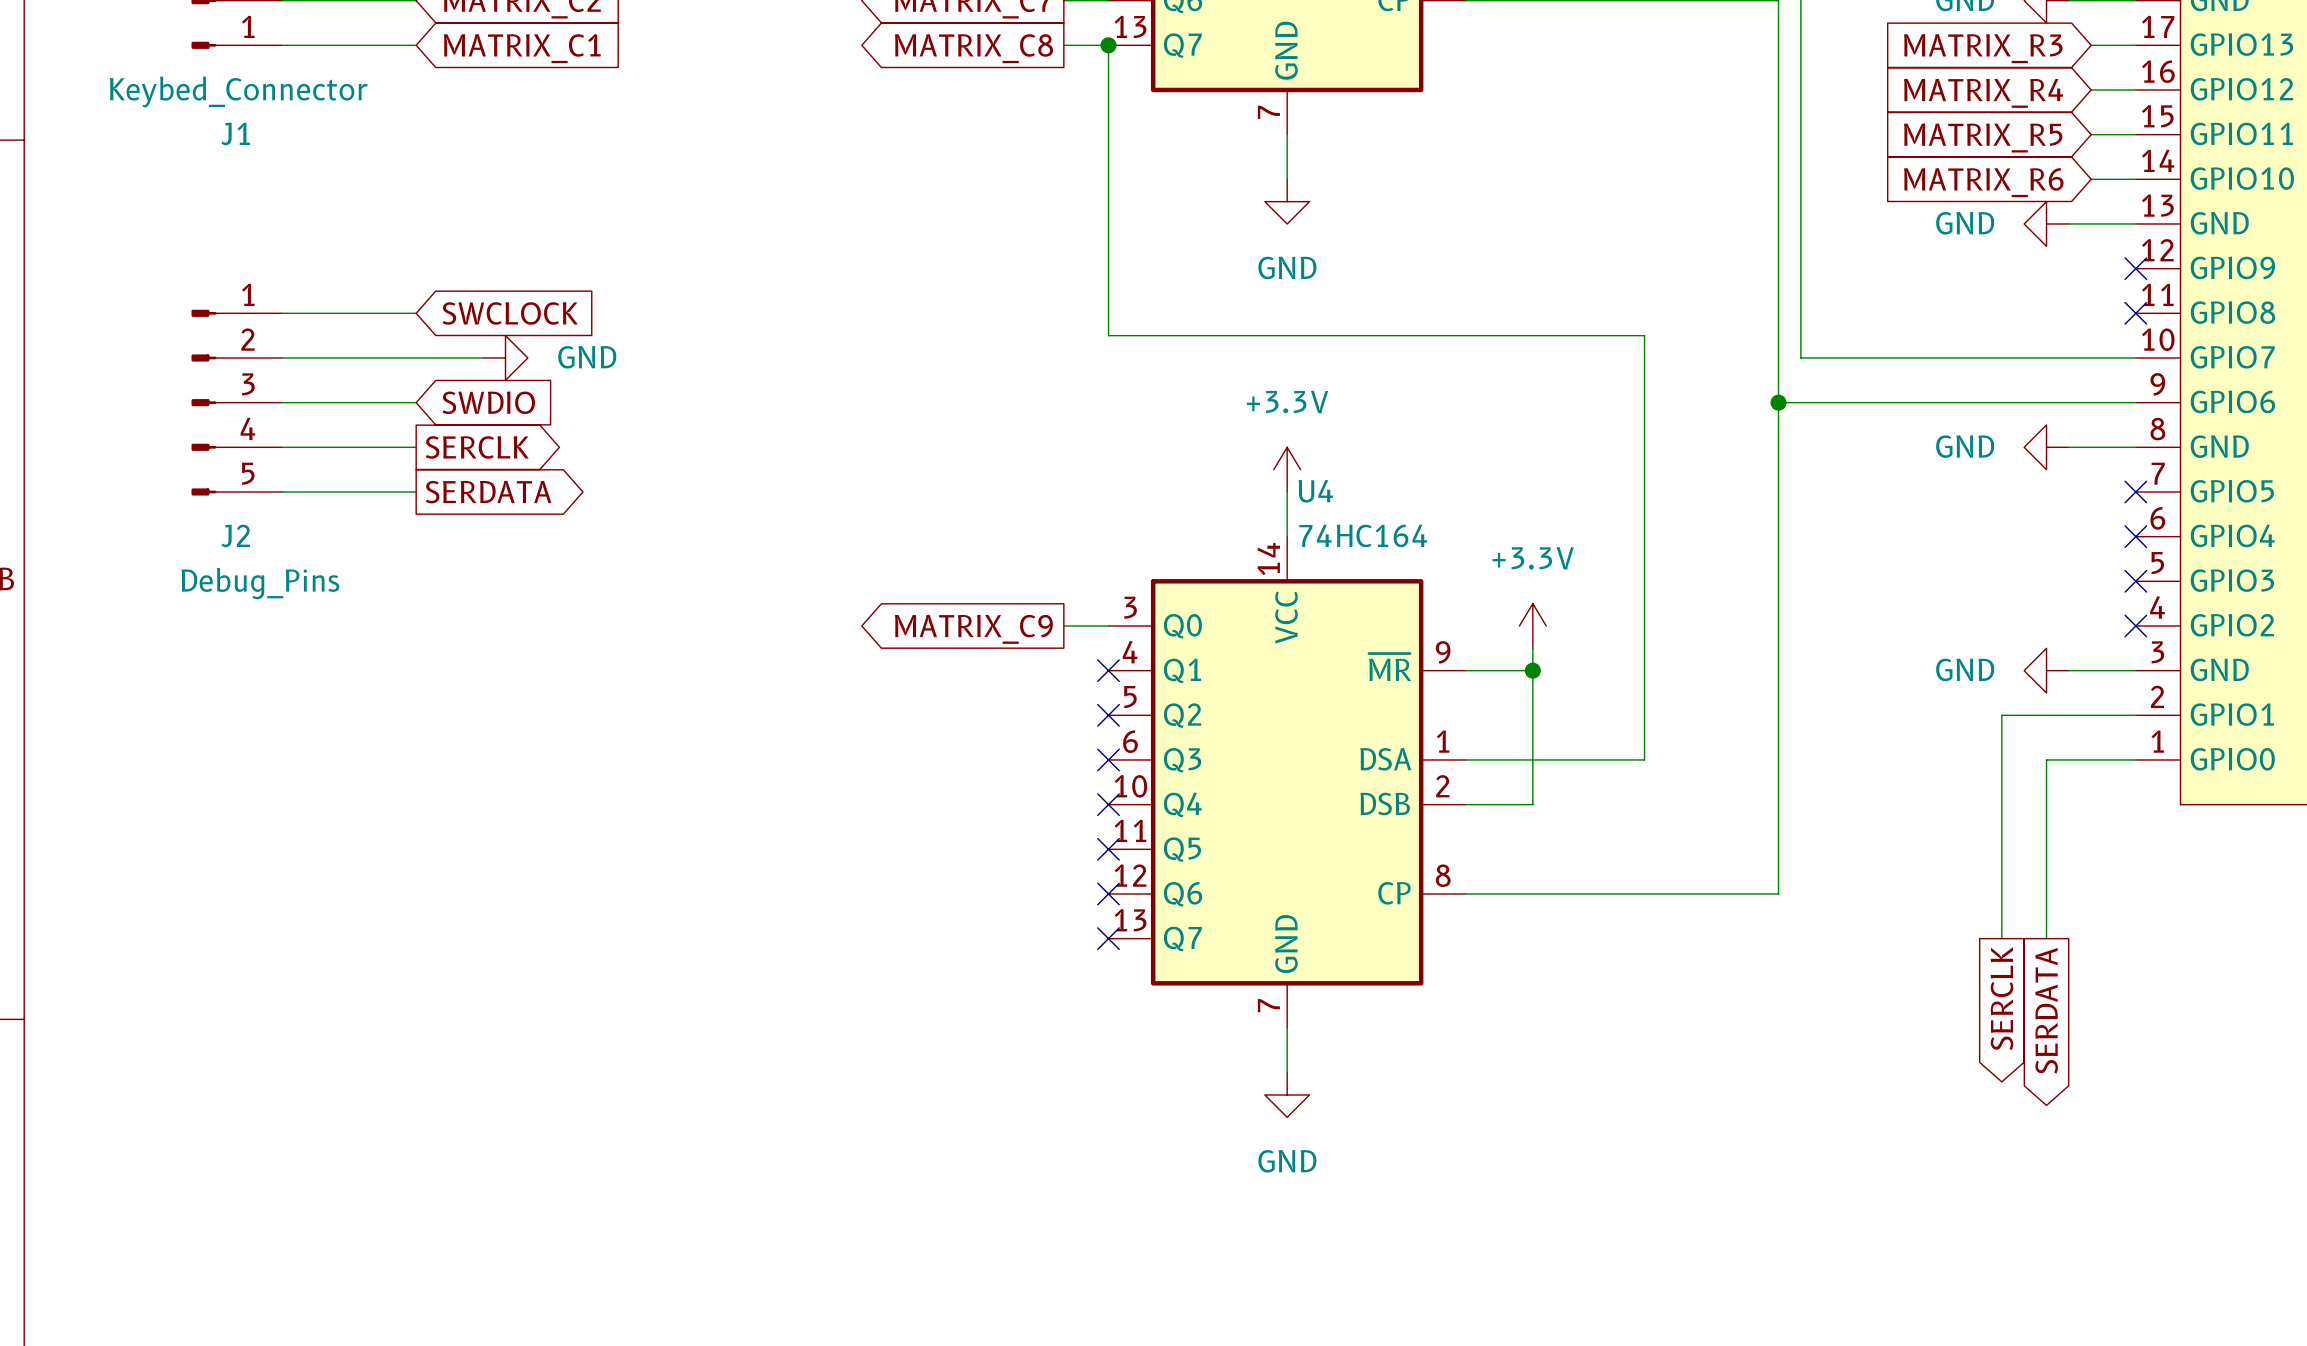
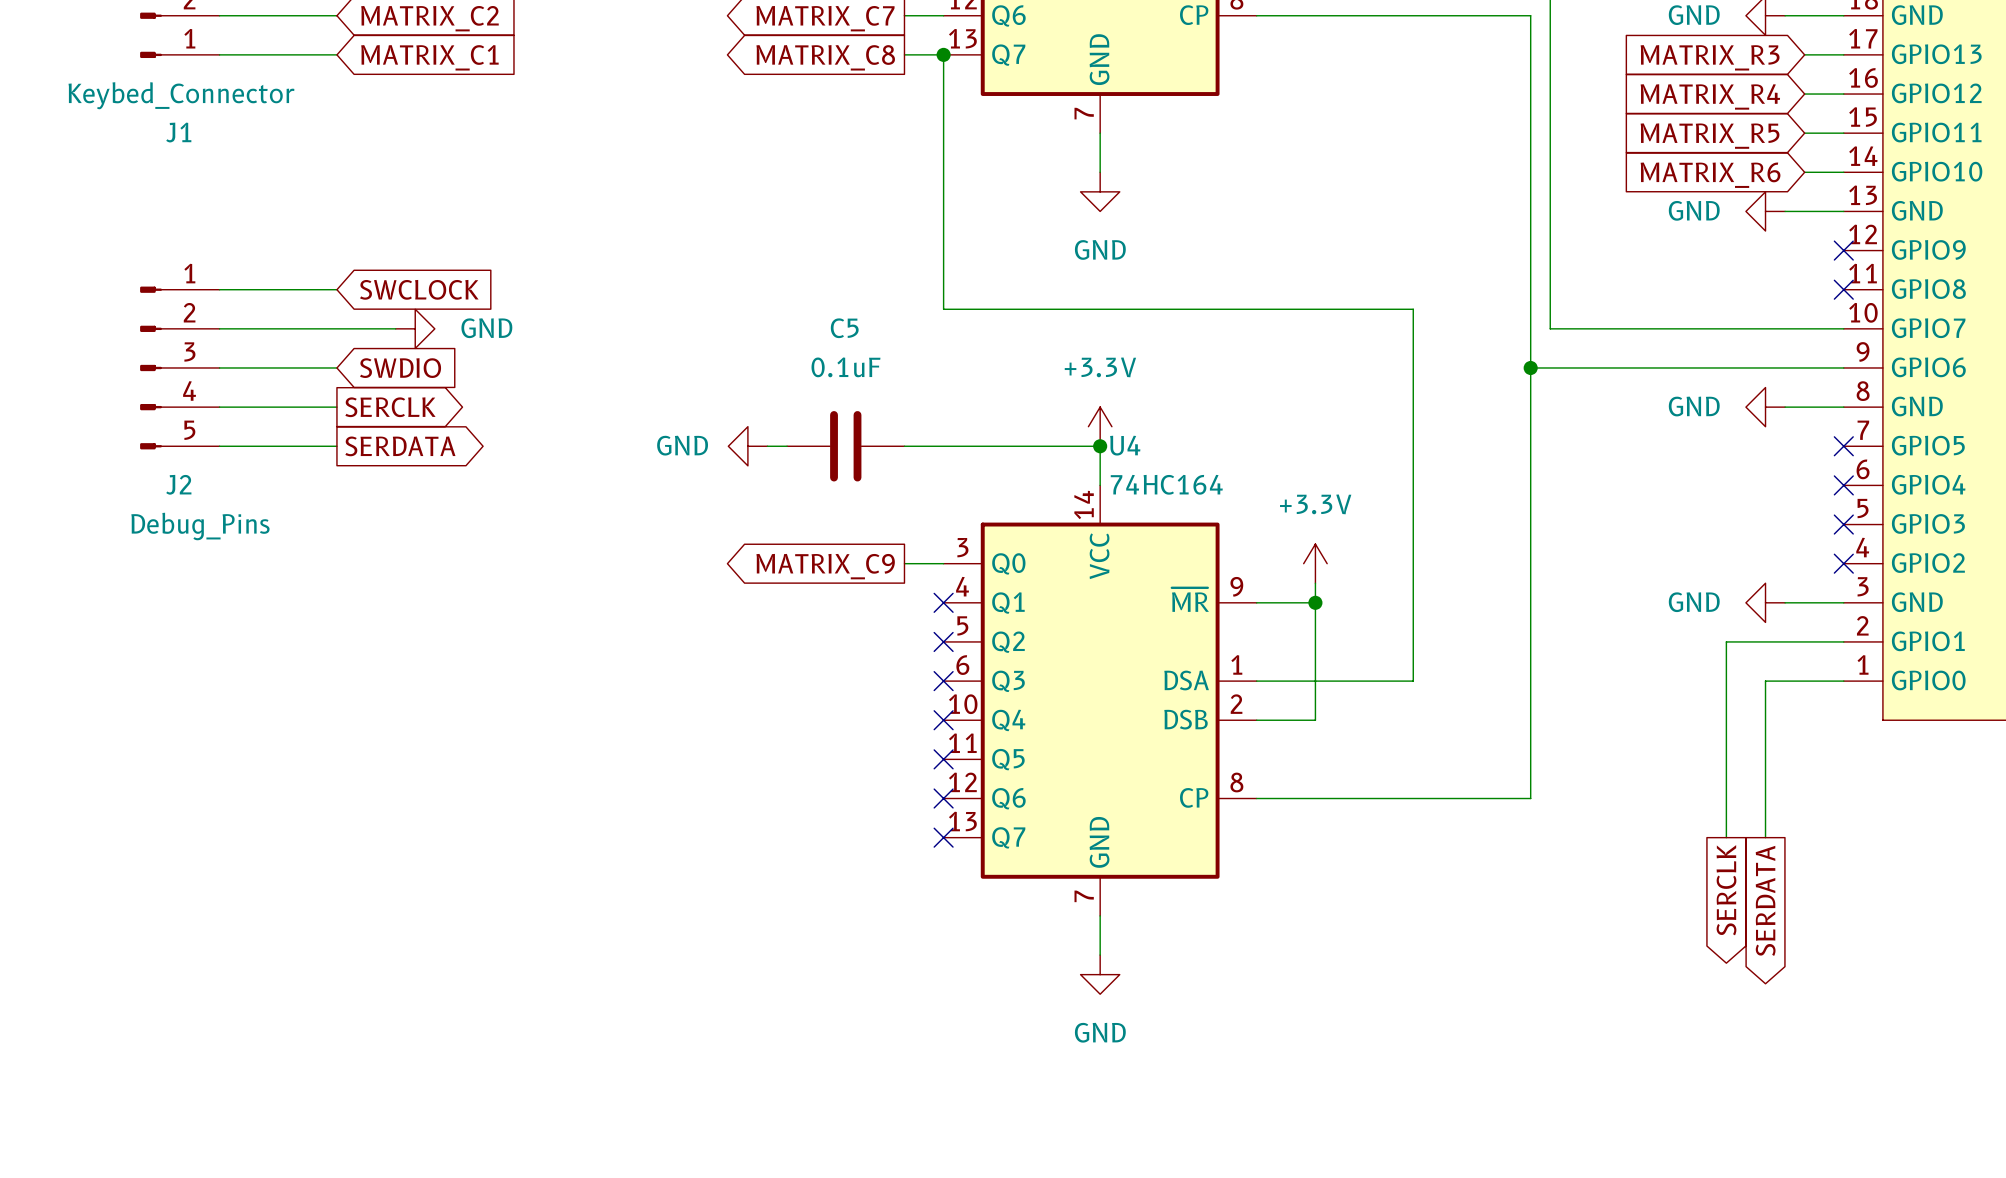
power symbol: none -> GND (747, 446)
wire: none -> (767, 446) (787, 446)
C5: none -> 0.1uF (845, 446)
wire: none -> (904, 446) (1100, 446)
junction: none -> (1100, 446)

